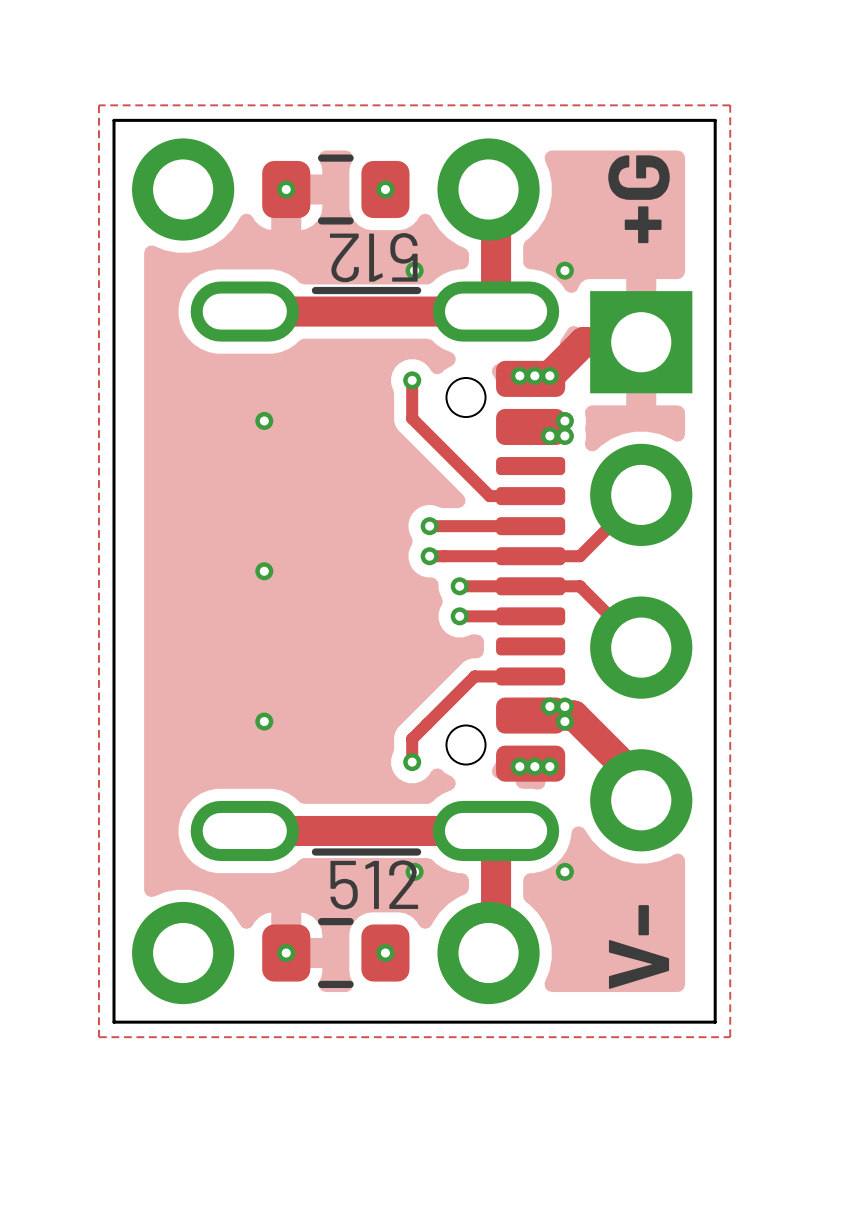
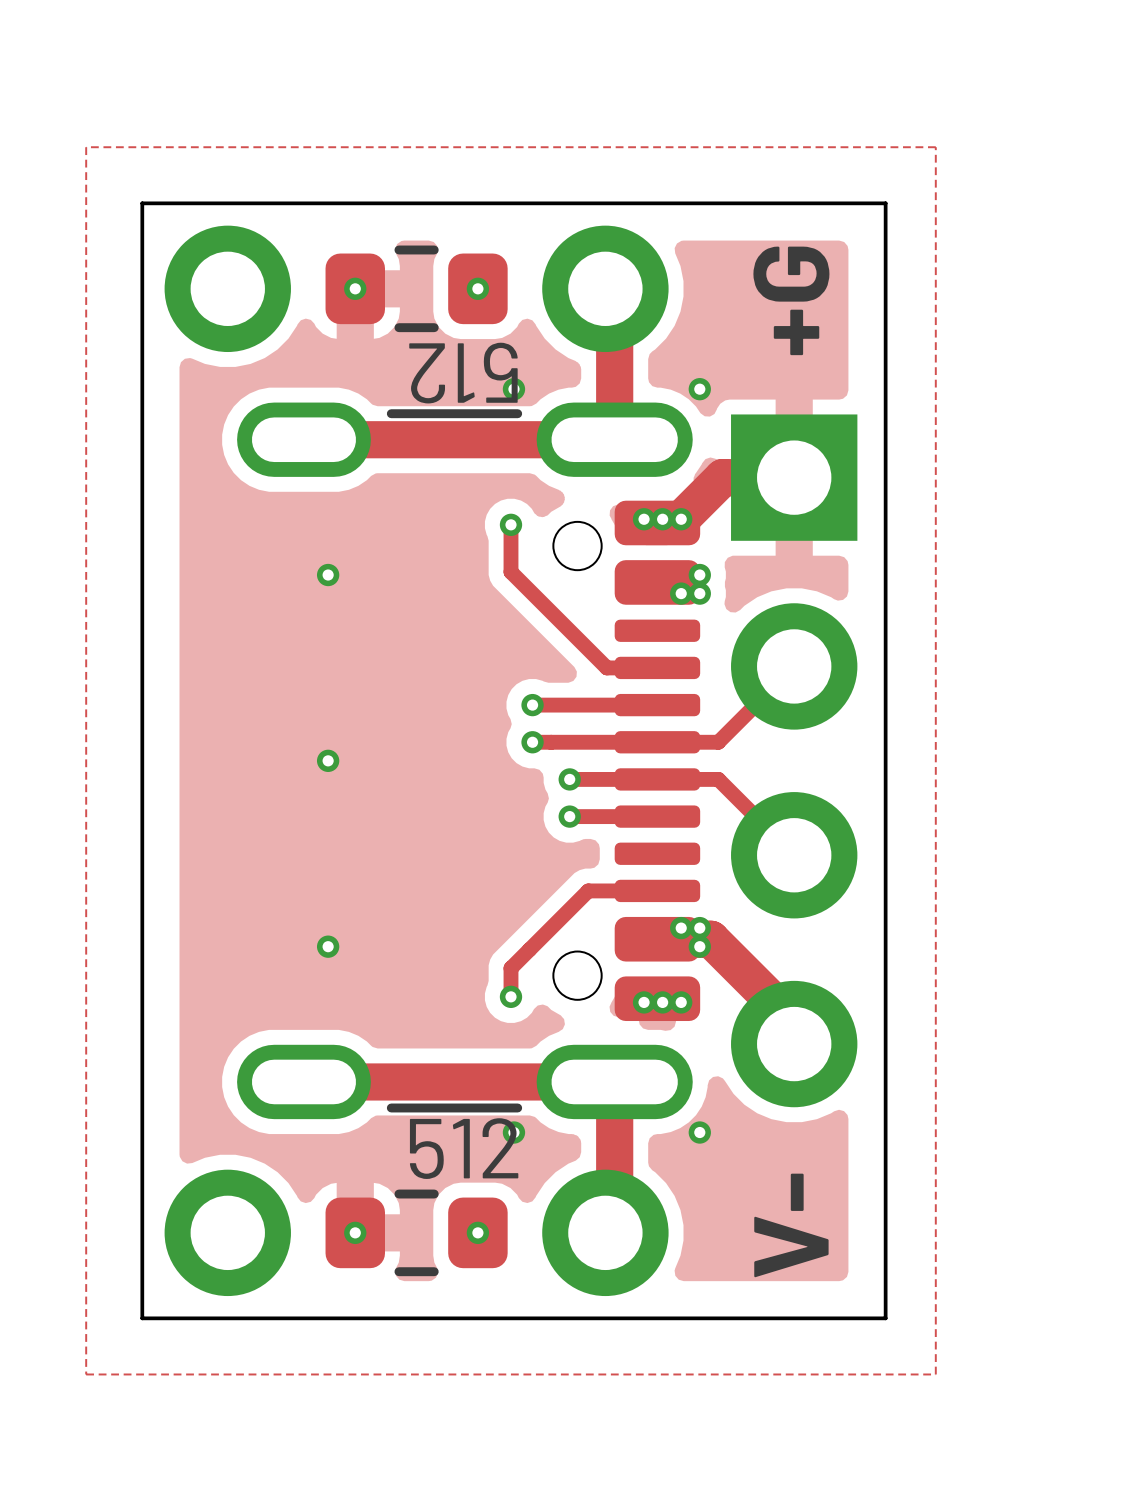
zone outline: (98, 105) (98, 1037) (730, 1037) (730, 105) (98, 105) -> (86, 147) (86, 1374) (935, 1374) (935, 147) (86, 147)

